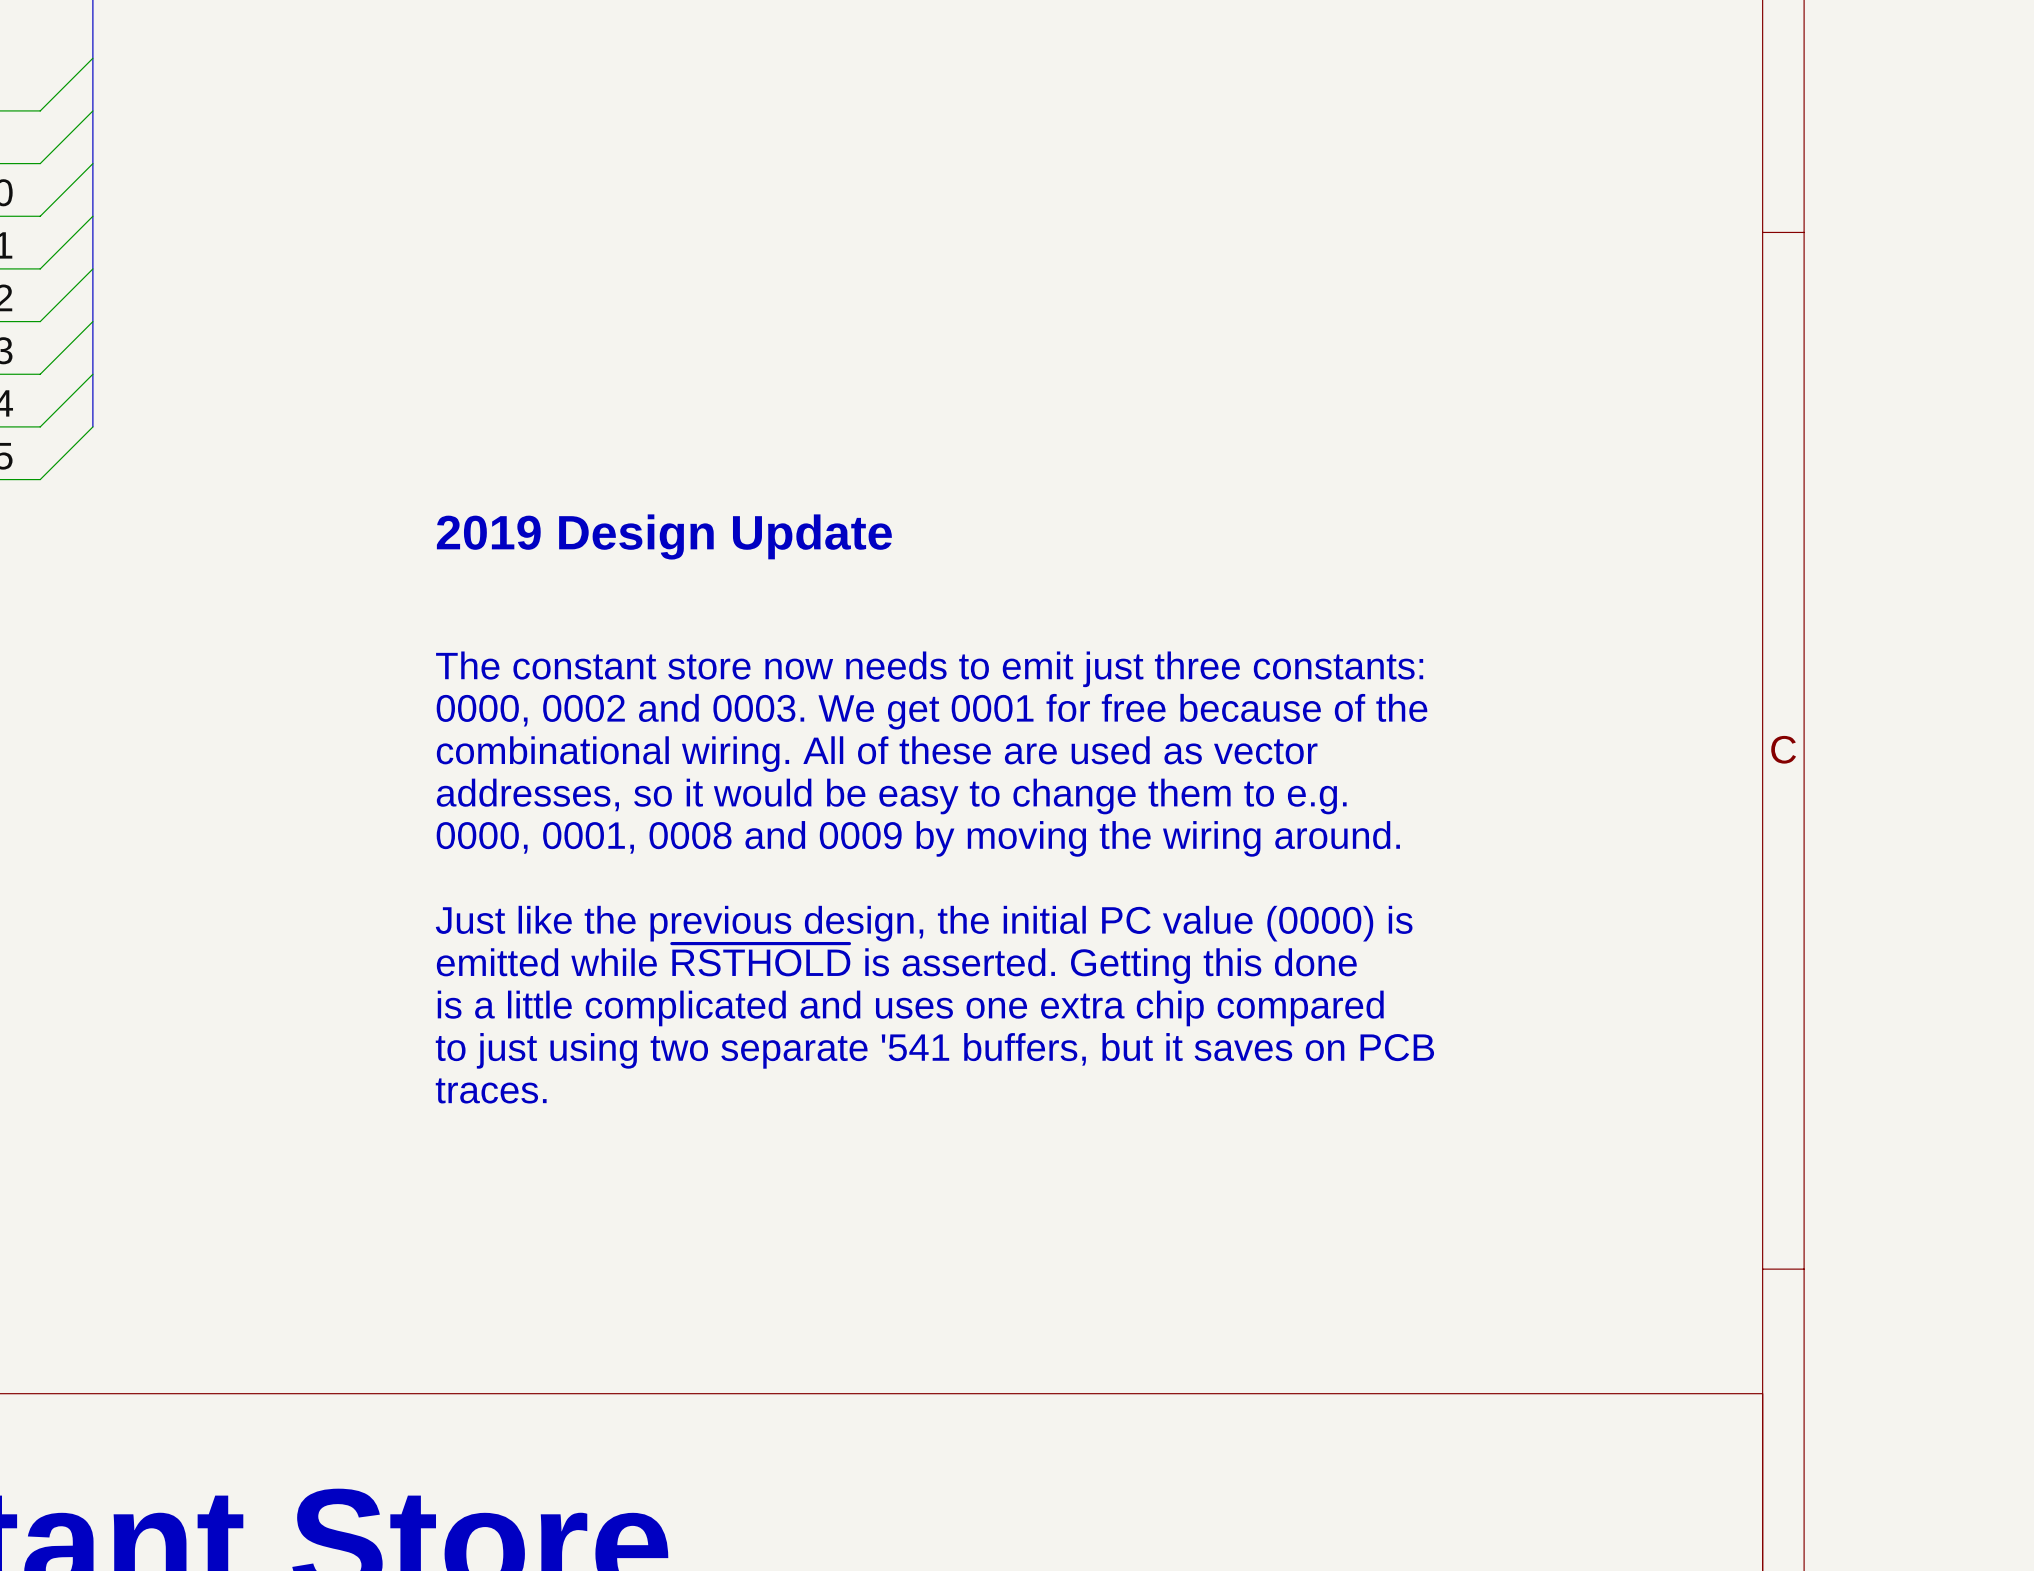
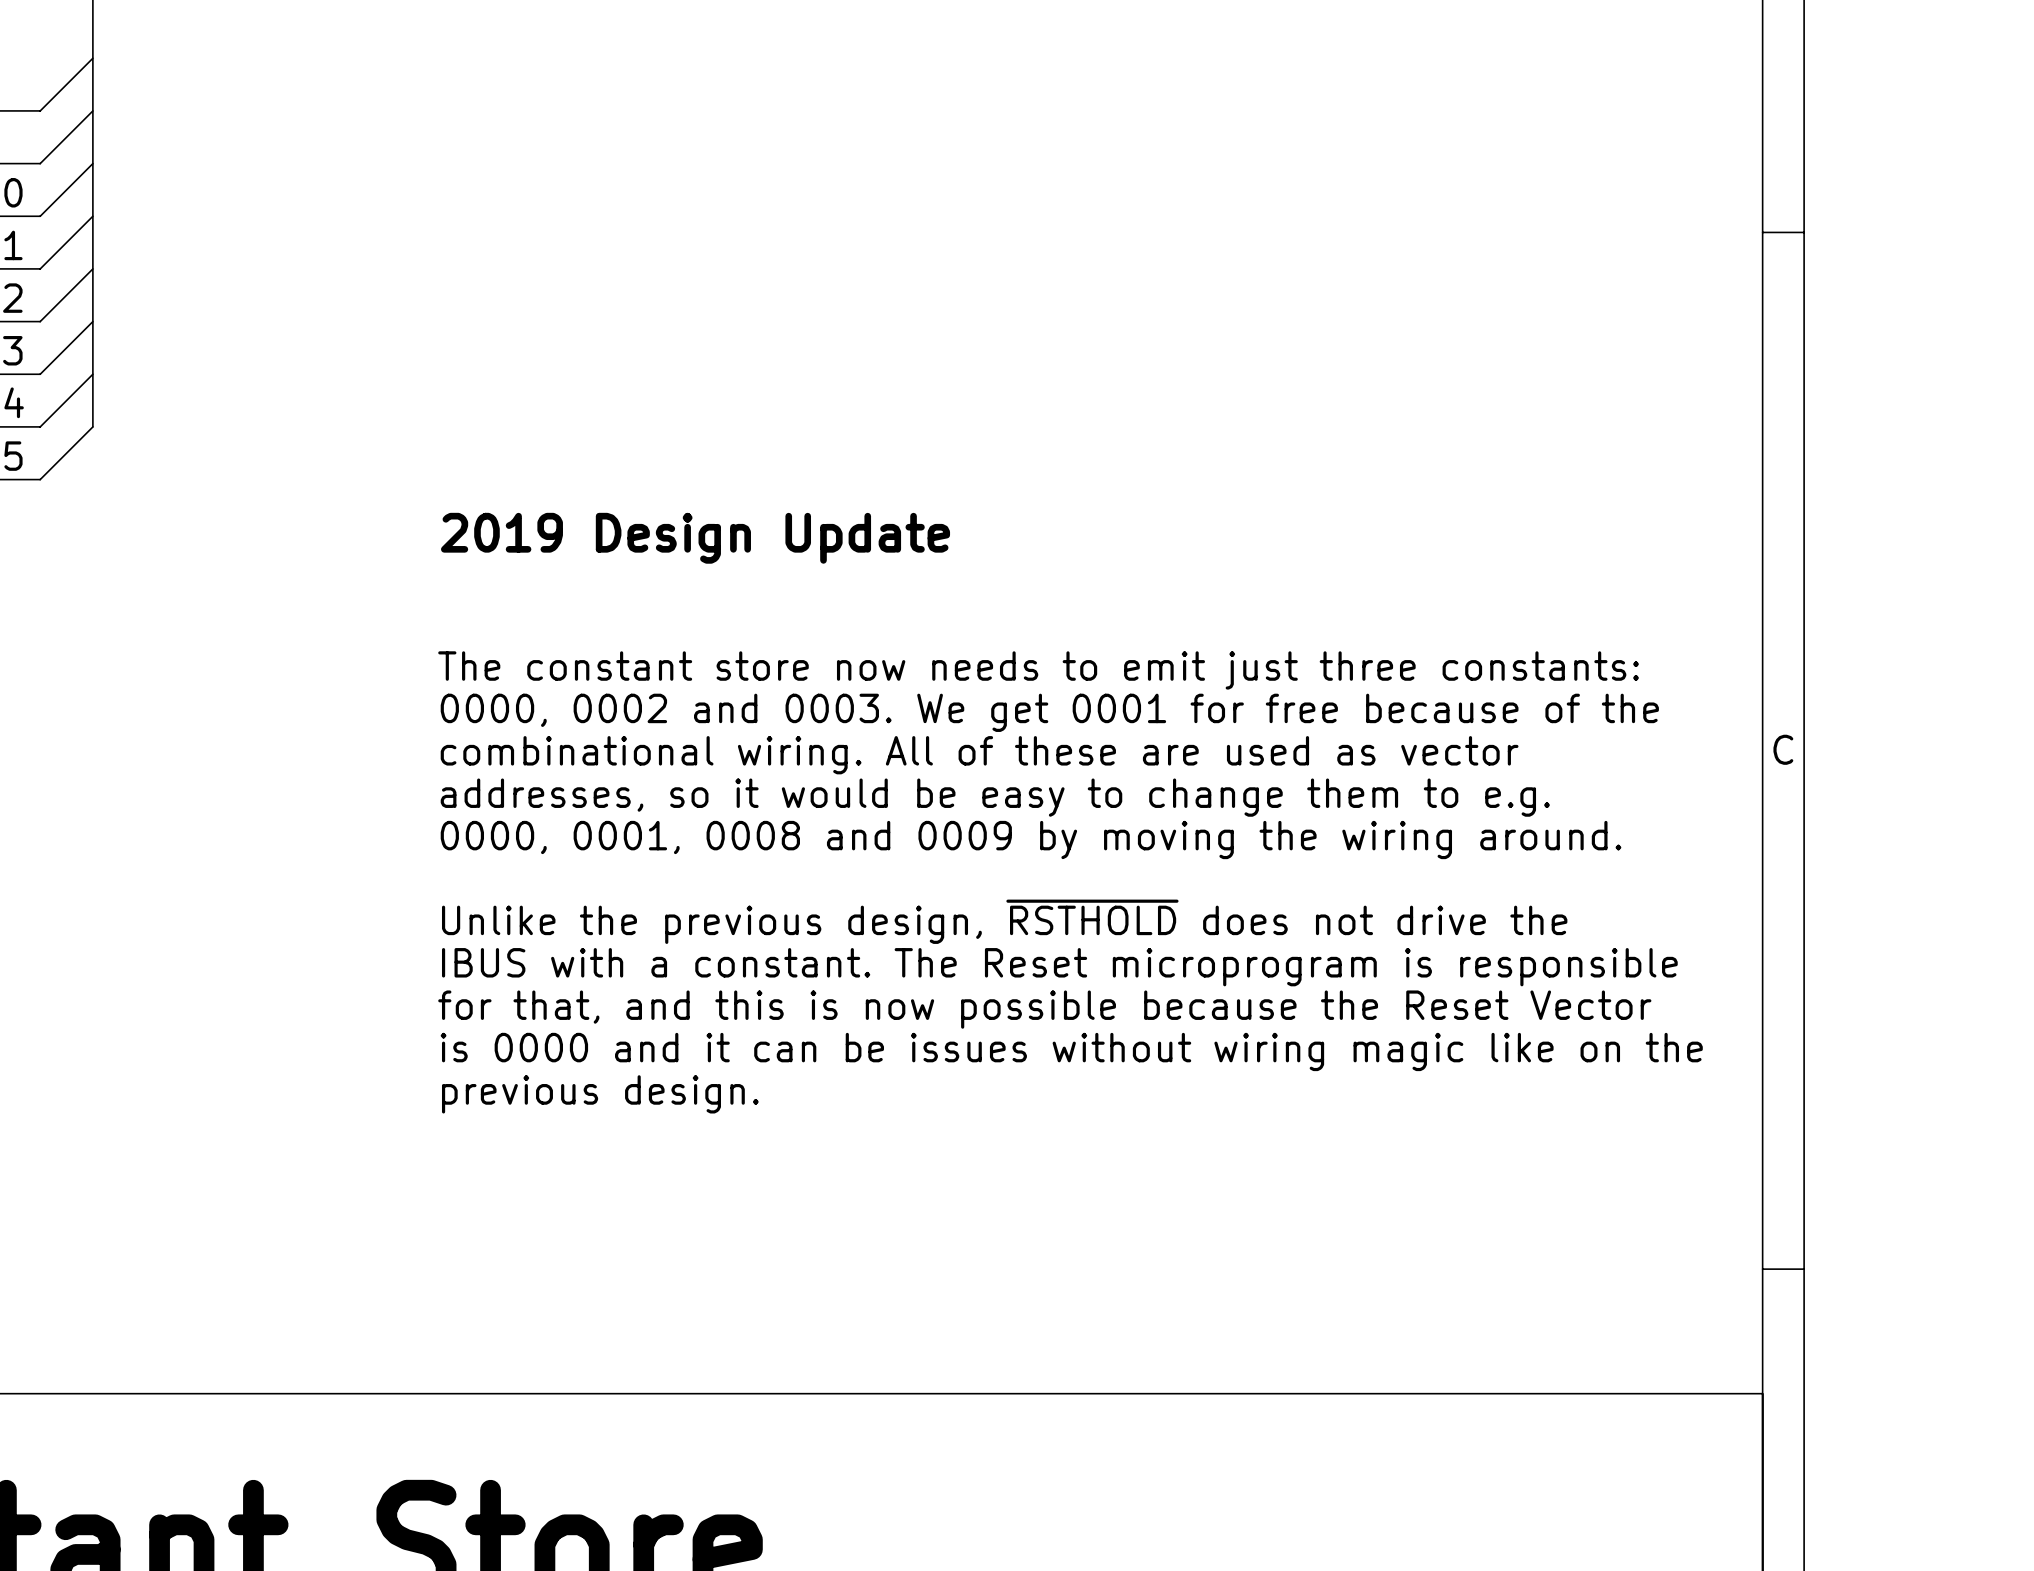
text: Just like the previous design, the initial PC value (0000) is (924, 923) -> Unlike the previous design, ~{RSTHOLD} does not drive the (1004, 921)
text: emitted while ~{RSTHOLD} is asserted. Getting this done (896, 963) -> IBUS with a constant. The Reset microprogram is responsible (1059, 967)
text: is a little complicated and uses one extra chip compared (910, 1008) -> for that, and this is now possible because the Reset Vector (1044, 1009)
text: to just using two separate '541 buffers, but it saves on PCB (934, 1050) -> is 0000 and it can be issues without wiring magic like on the (1071, 1051)
text: traces. (491, 1090) -> previous design. (600, 1094)

